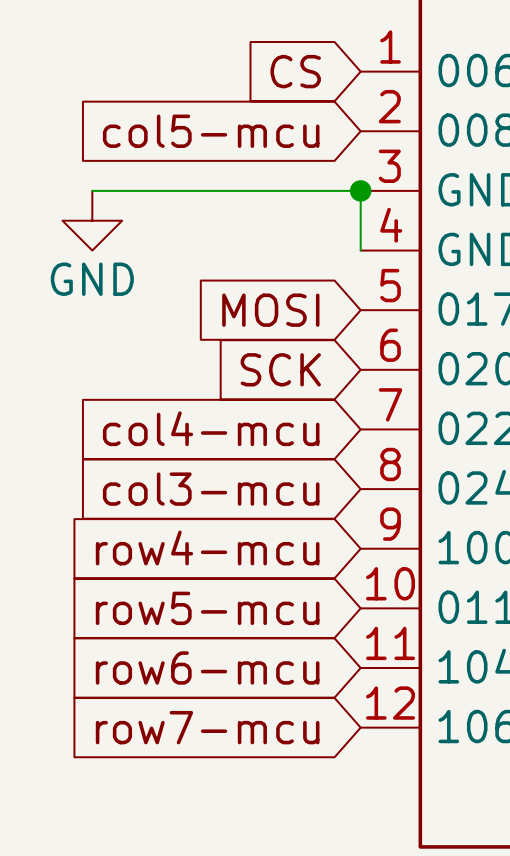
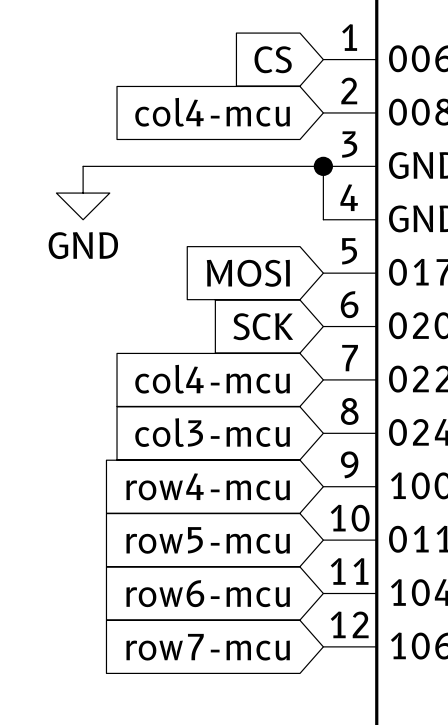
global label: col5-mcu (211, 131) -> col4-mcu (212, 112)

